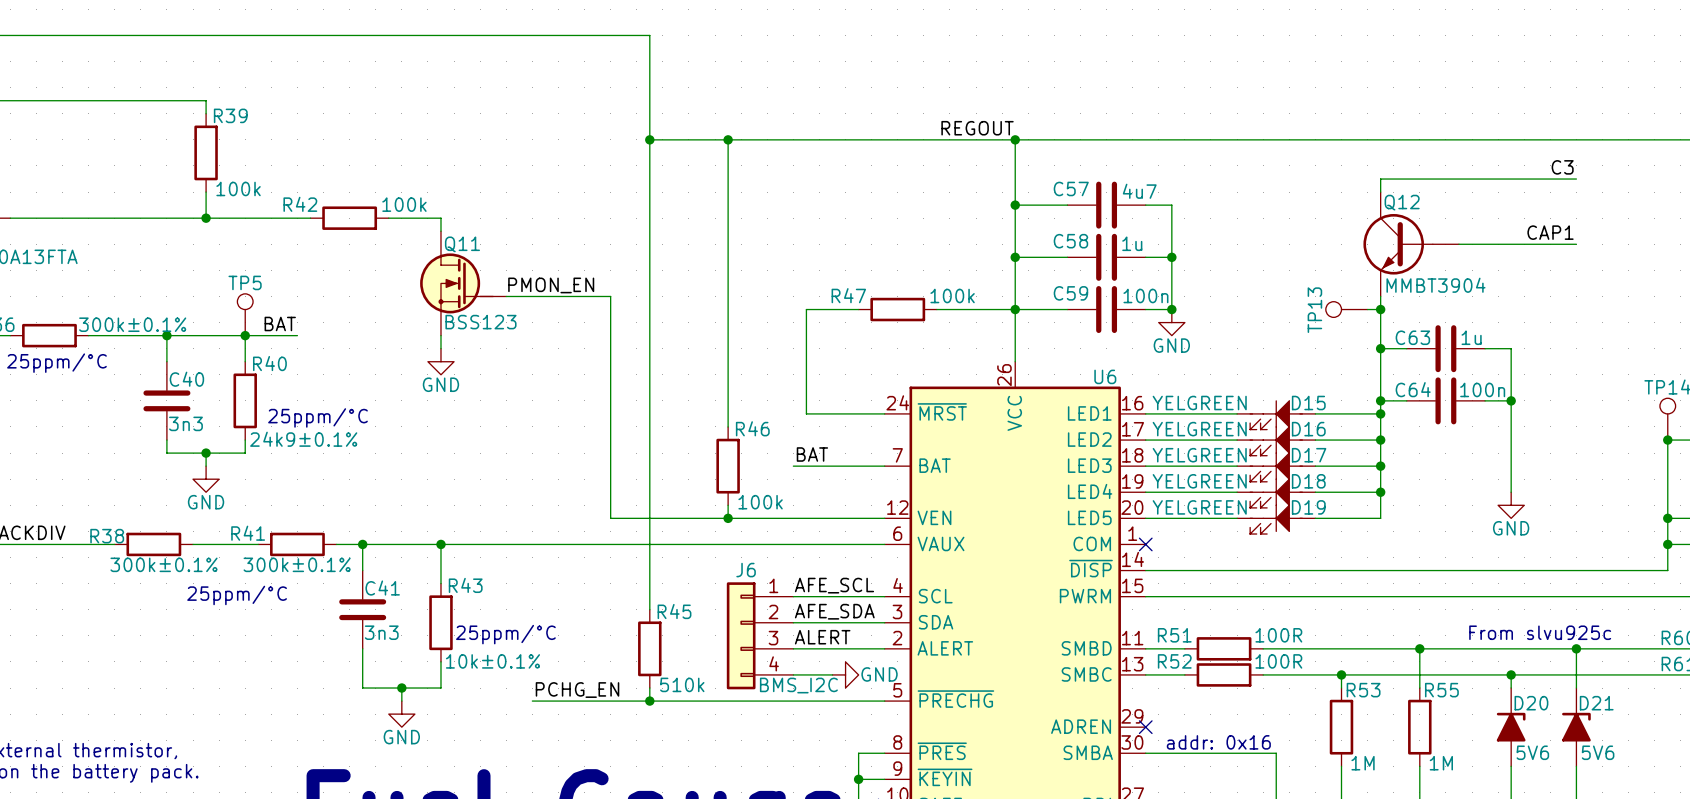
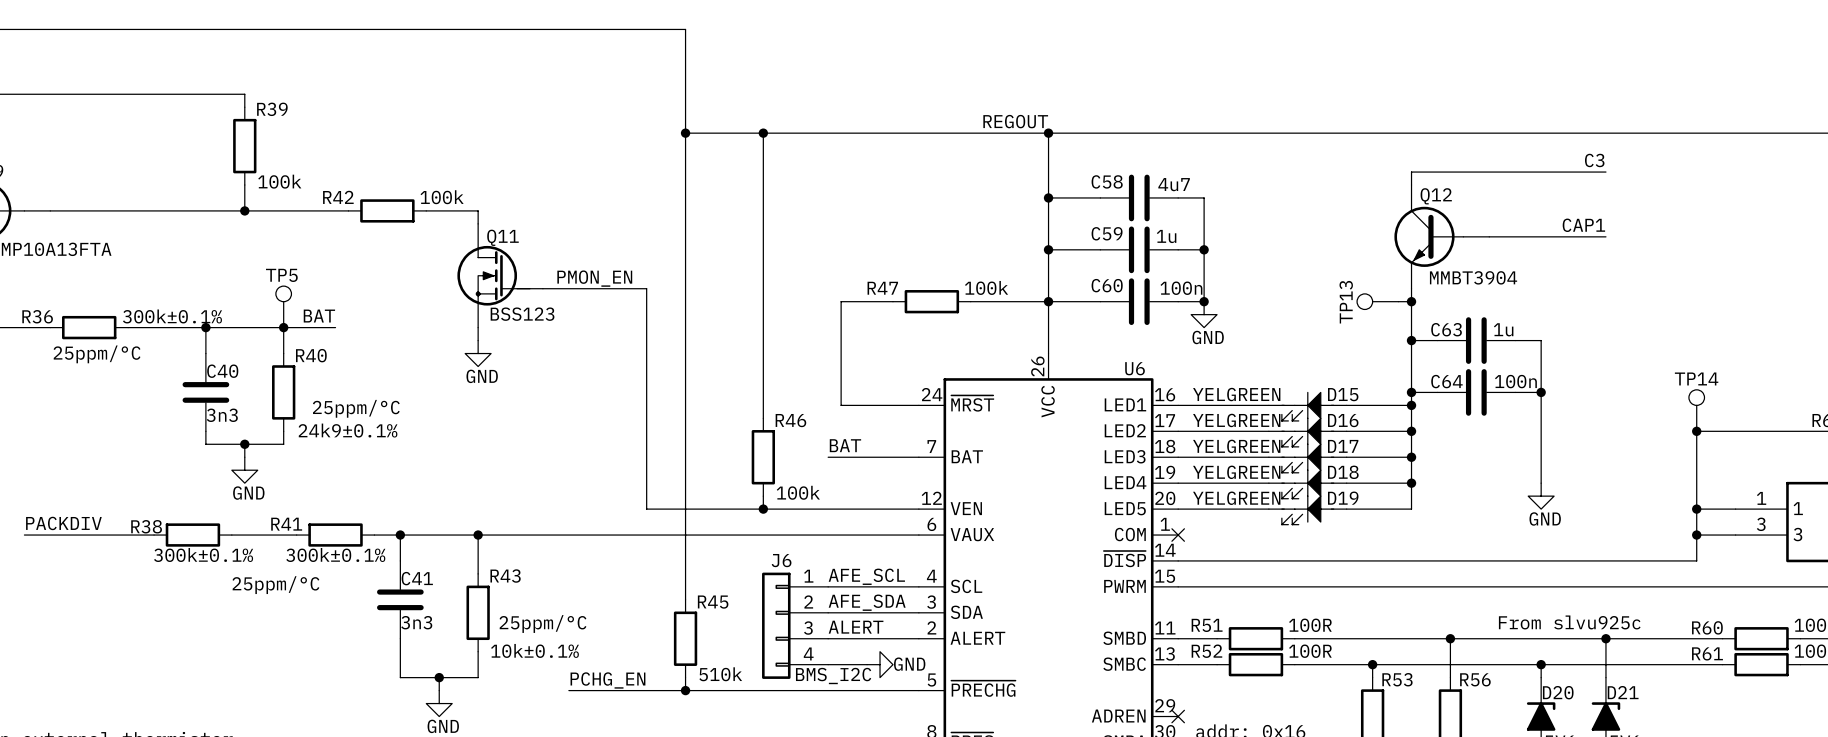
C57 name: C57 (1071, 188) -> C58 (1107, 181)
C58 name: C58 (1070, 241) -> C59 (1107, 233)
C59 name: C59 (1070, 293) -> C60 (1107, 285)
R55 name: R55 (1441, 690) -> R56 (1475, 679)

